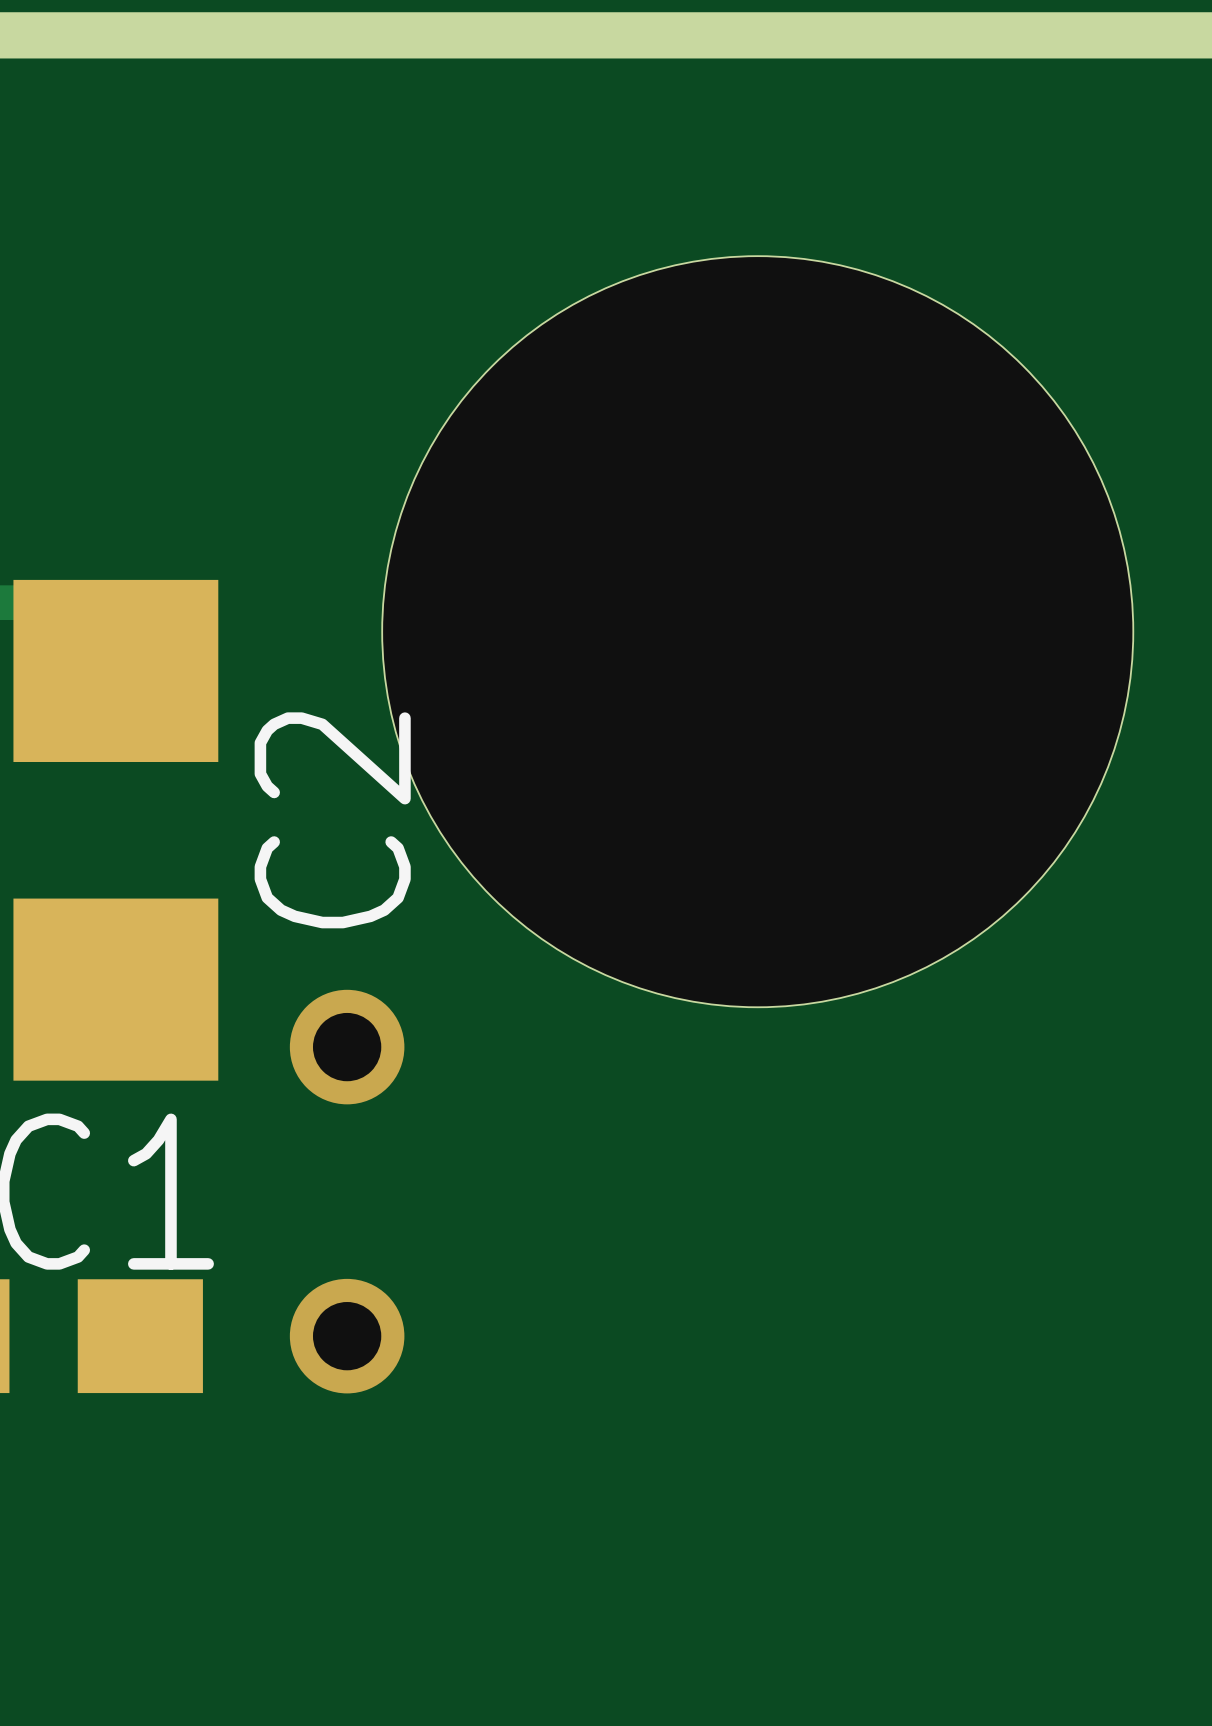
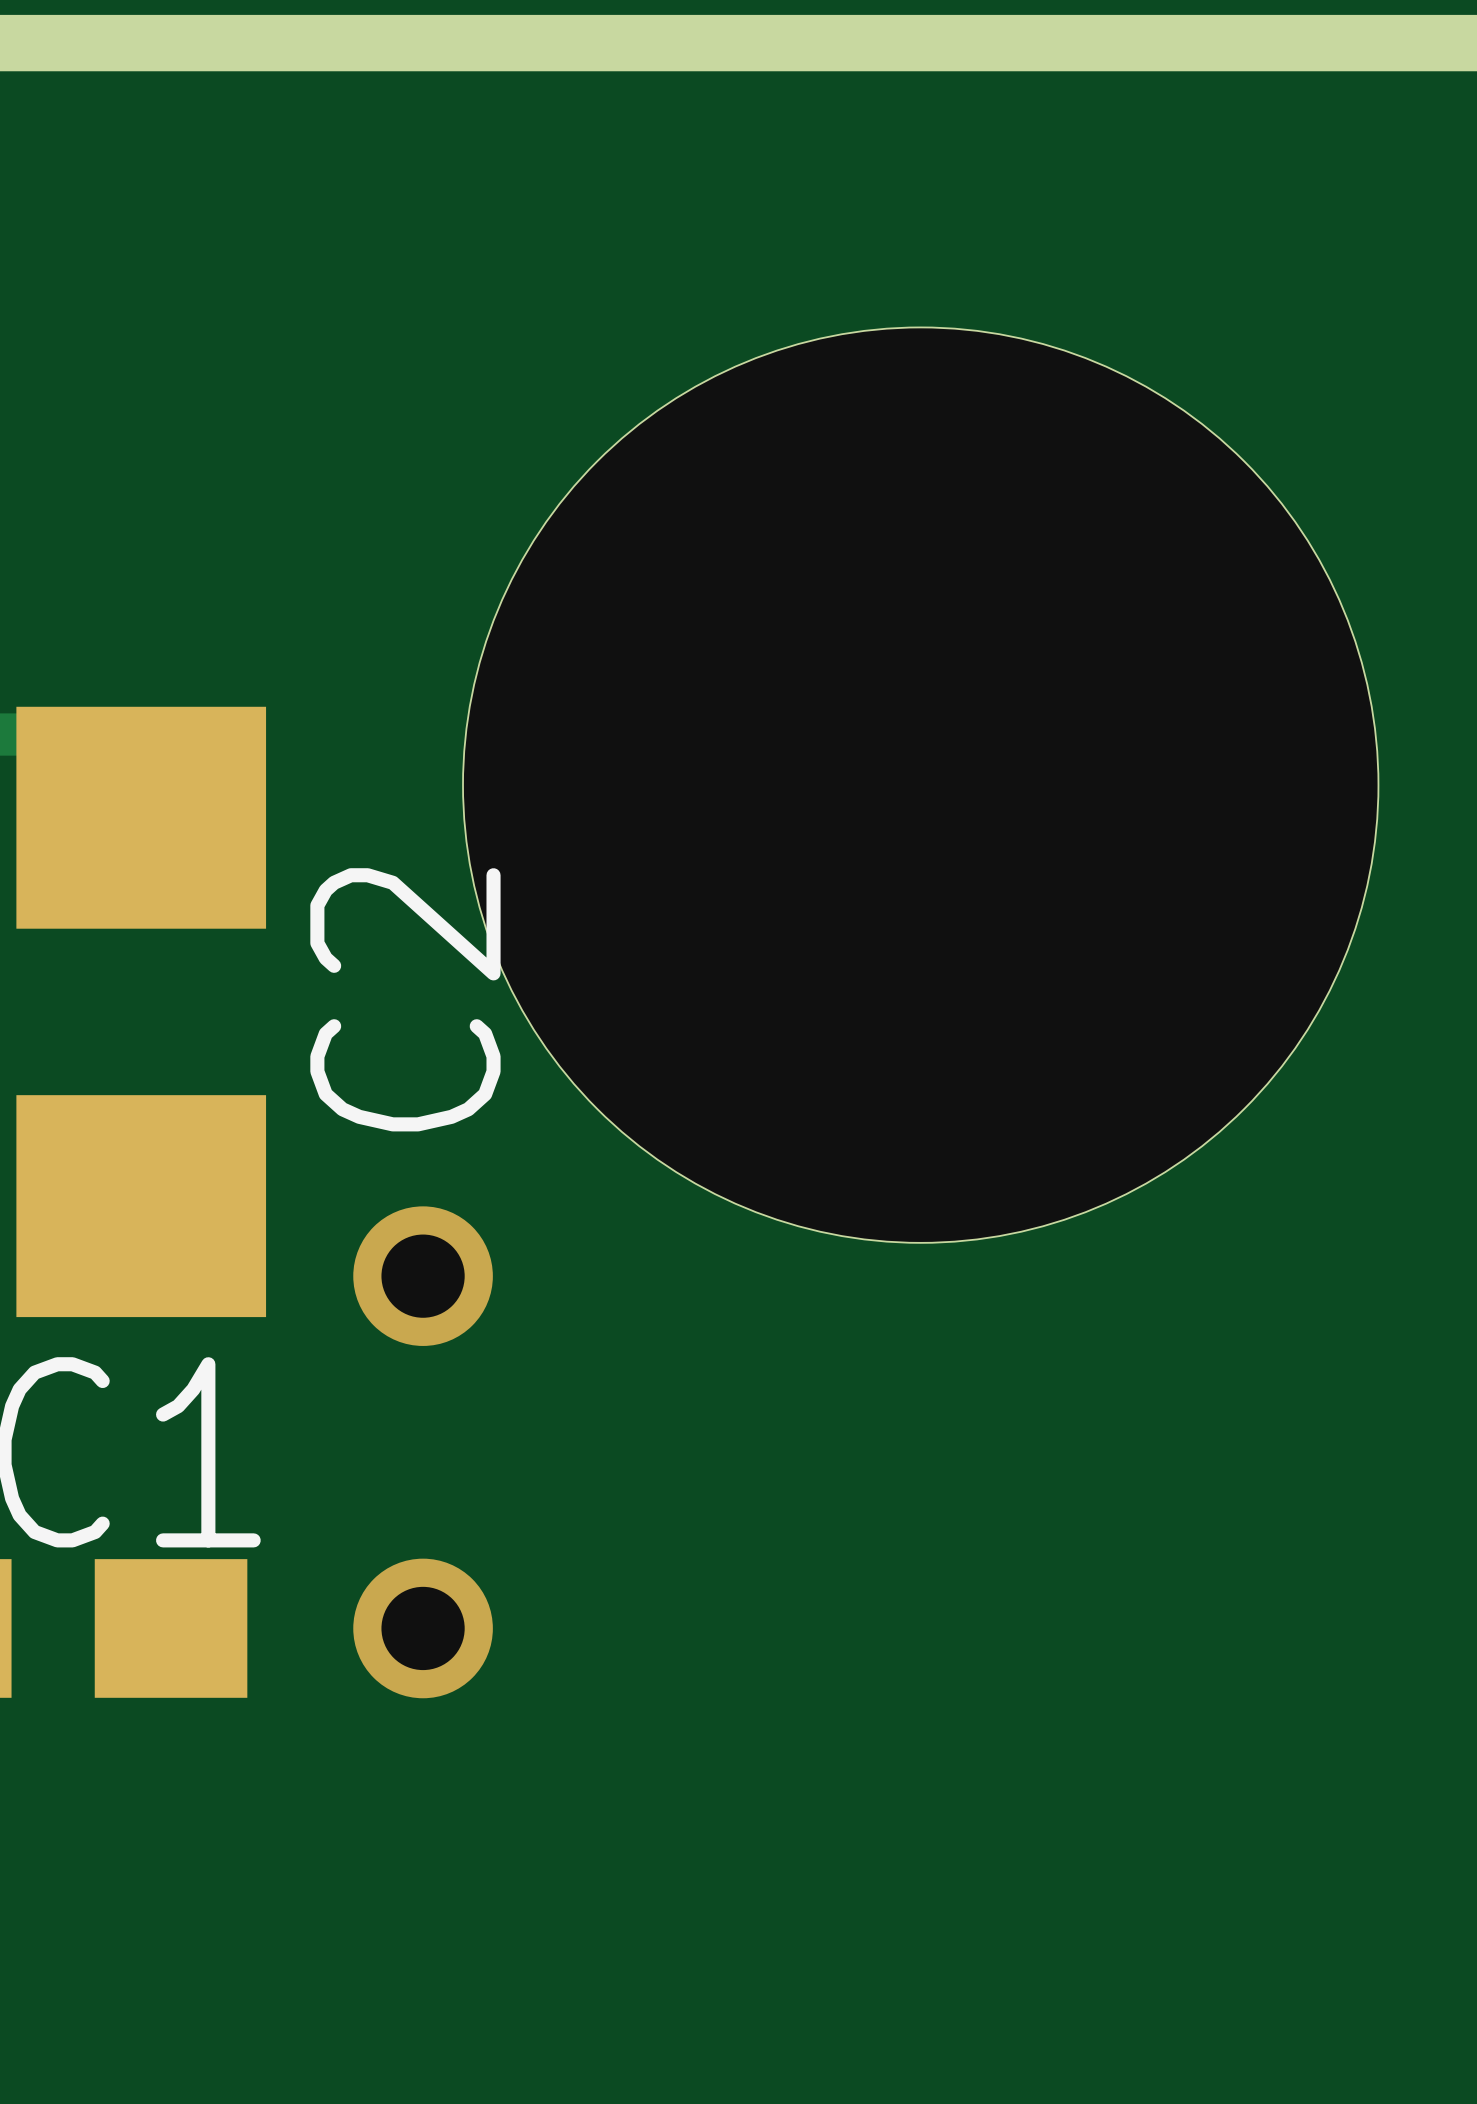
hole position: (757, 631) -> (920, 785)

